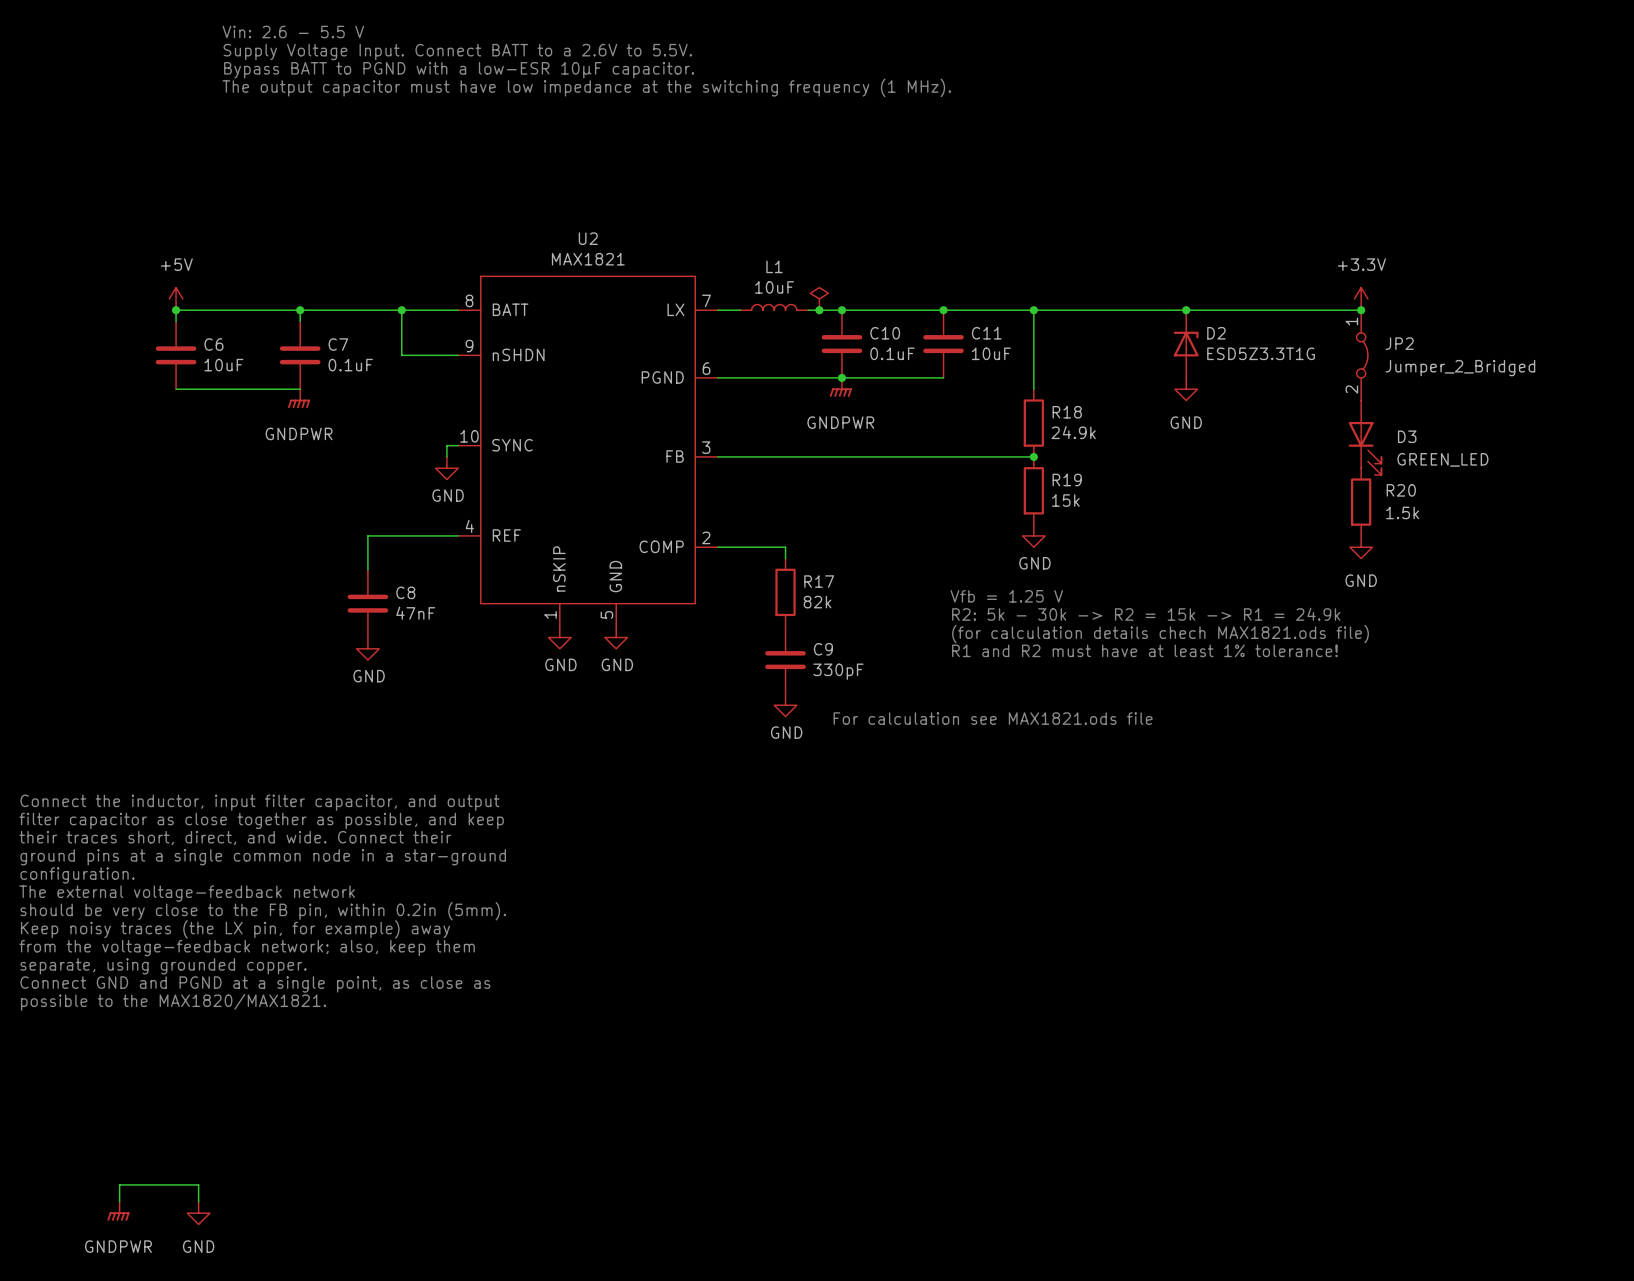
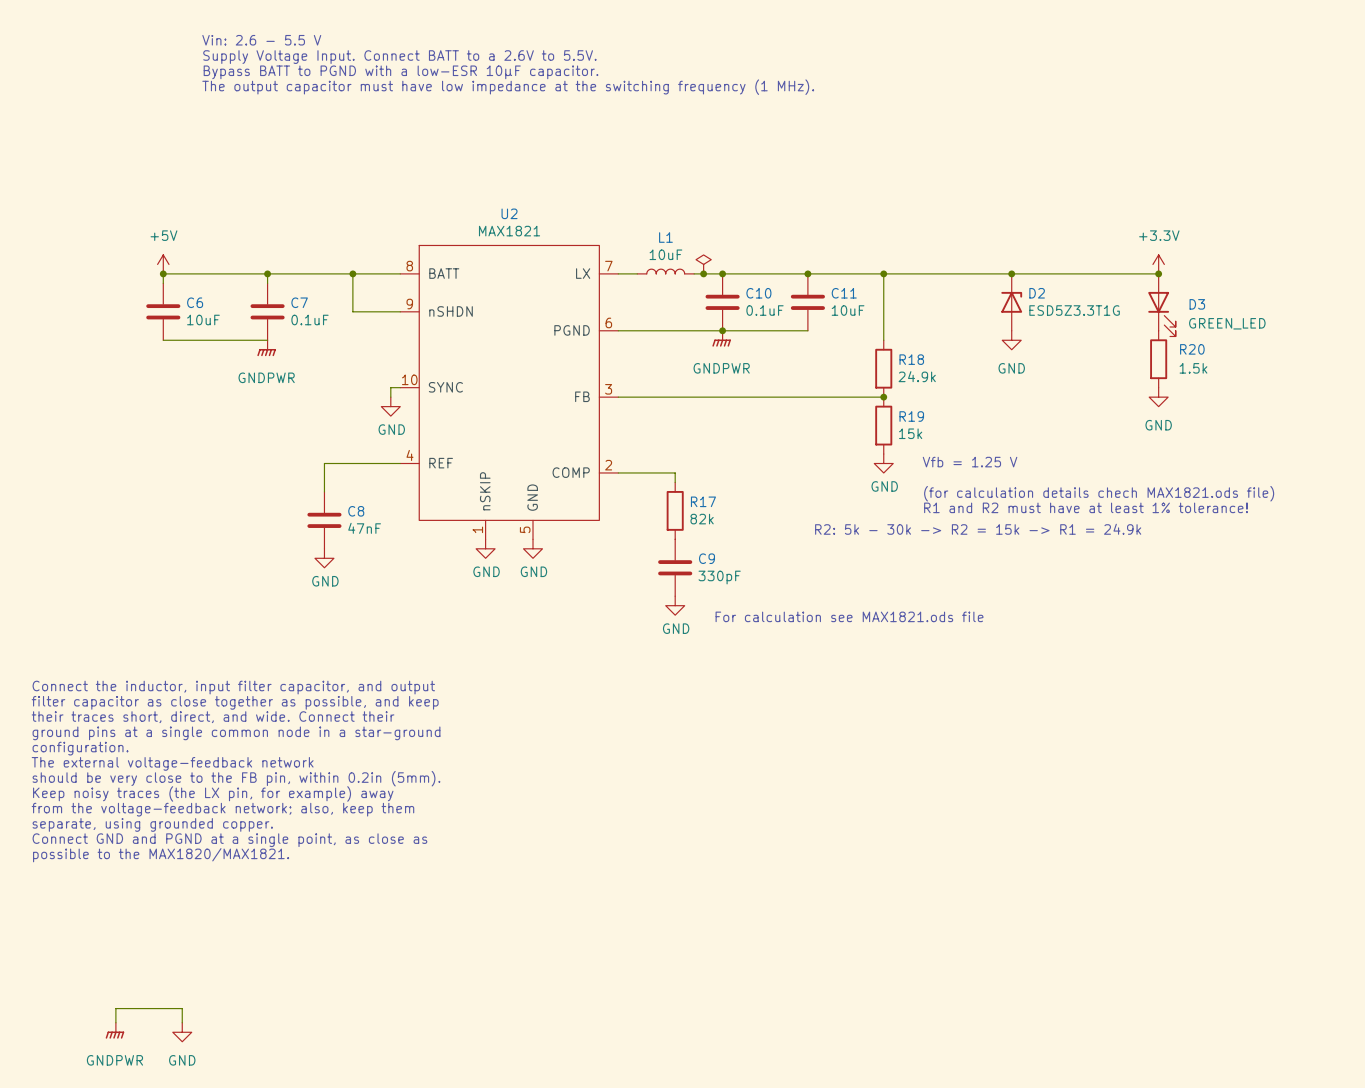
JP2: Jumper_2_Bridged (1362, 355) -> none
D3 position: (1365, 437) -> (1161, 305)
R20 position: (1361, 502) -> (1158, 359)
power symbol position: GND (1361, 547) -> GND (1158, 397)
text position: Vfb = 1.25 V (1006, 596) -> Vfb = 1.25 V (970, 462)
text position: (for calculation details chech MAX1821.ods file) (1160, 634) -> (for calculation details chech MAX1821.ods file) (1099, 493)
text position: R1 and R2 must have at least 1% tolerance! (1144, 650) -> R1 and R2 must have at least 1% tolerance! (1086, 507)

